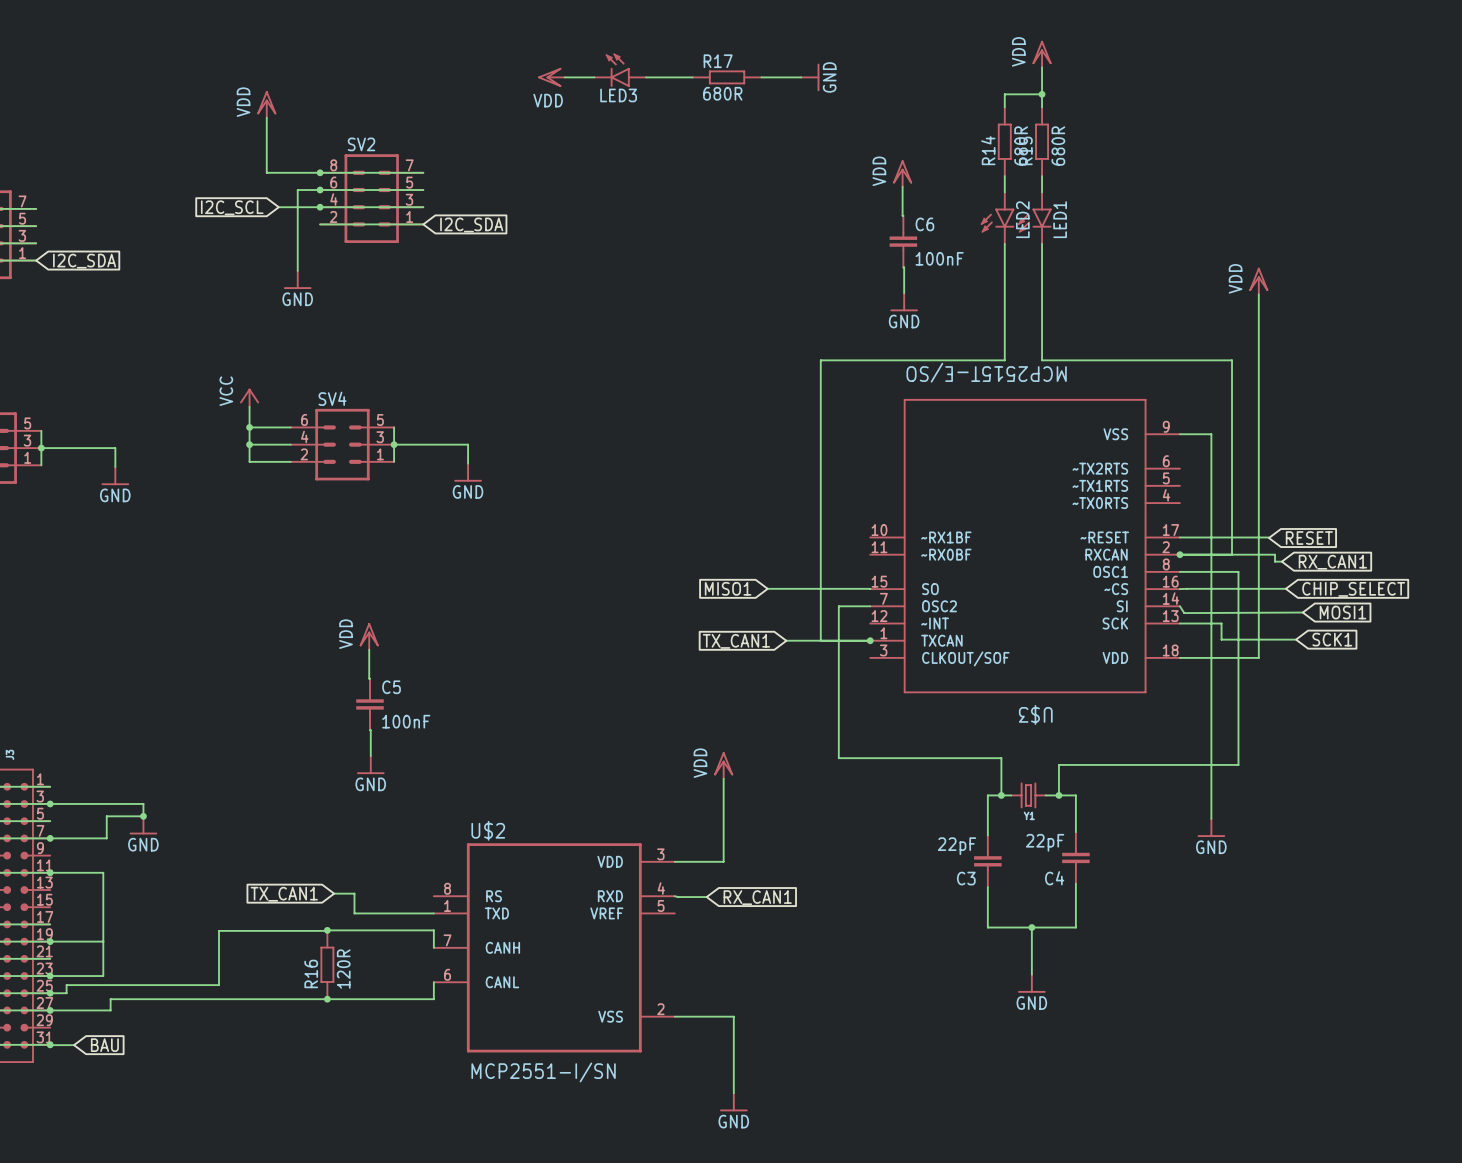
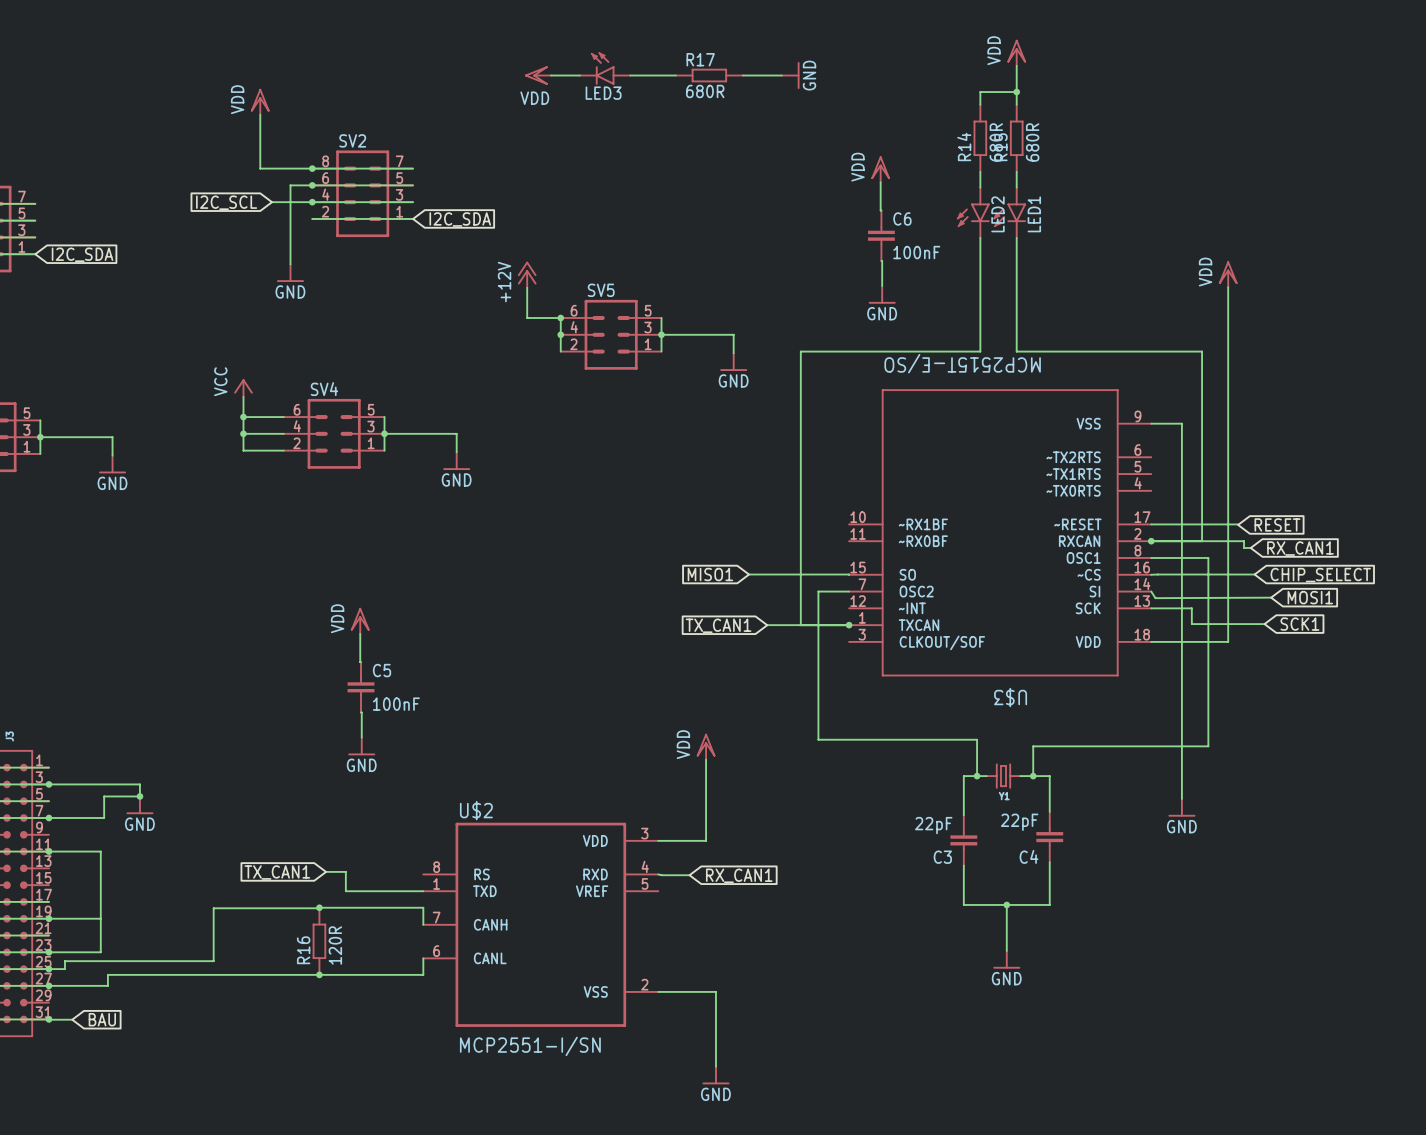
power symbol: none -> +12V (527, 274)
wire: none -> (527, 287) (527, 318) (560, 318) (560, 351)
junction: none -> (560, 318)
wire: none -> (661, 318) (661, 351)
junction: none -> (560, 334)
SV5: none -> (611, 334)
wire: none -> (661, 334) (733, 334) (733, 353)
junction: none -> (661, 334)
power symbol: none -> GND (733, 362)

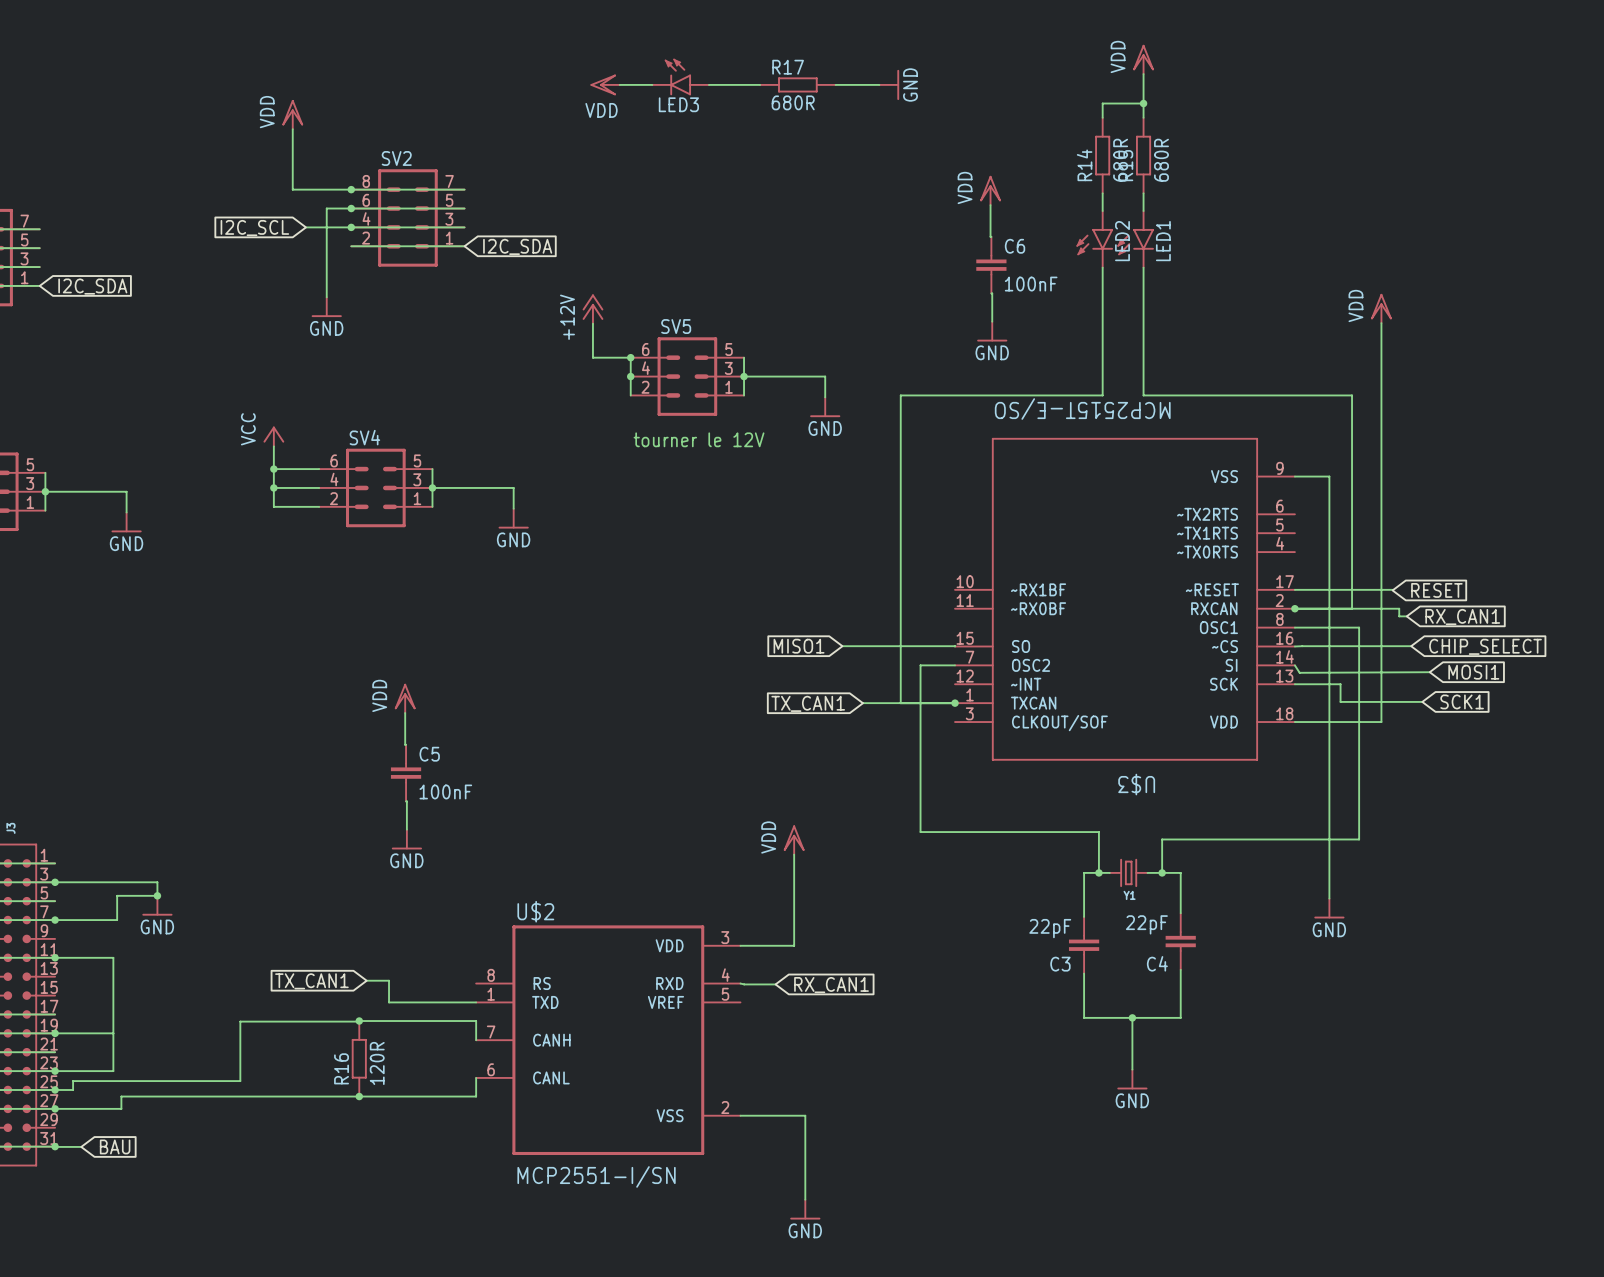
text: none -> tourner le 12V (699, 439)

